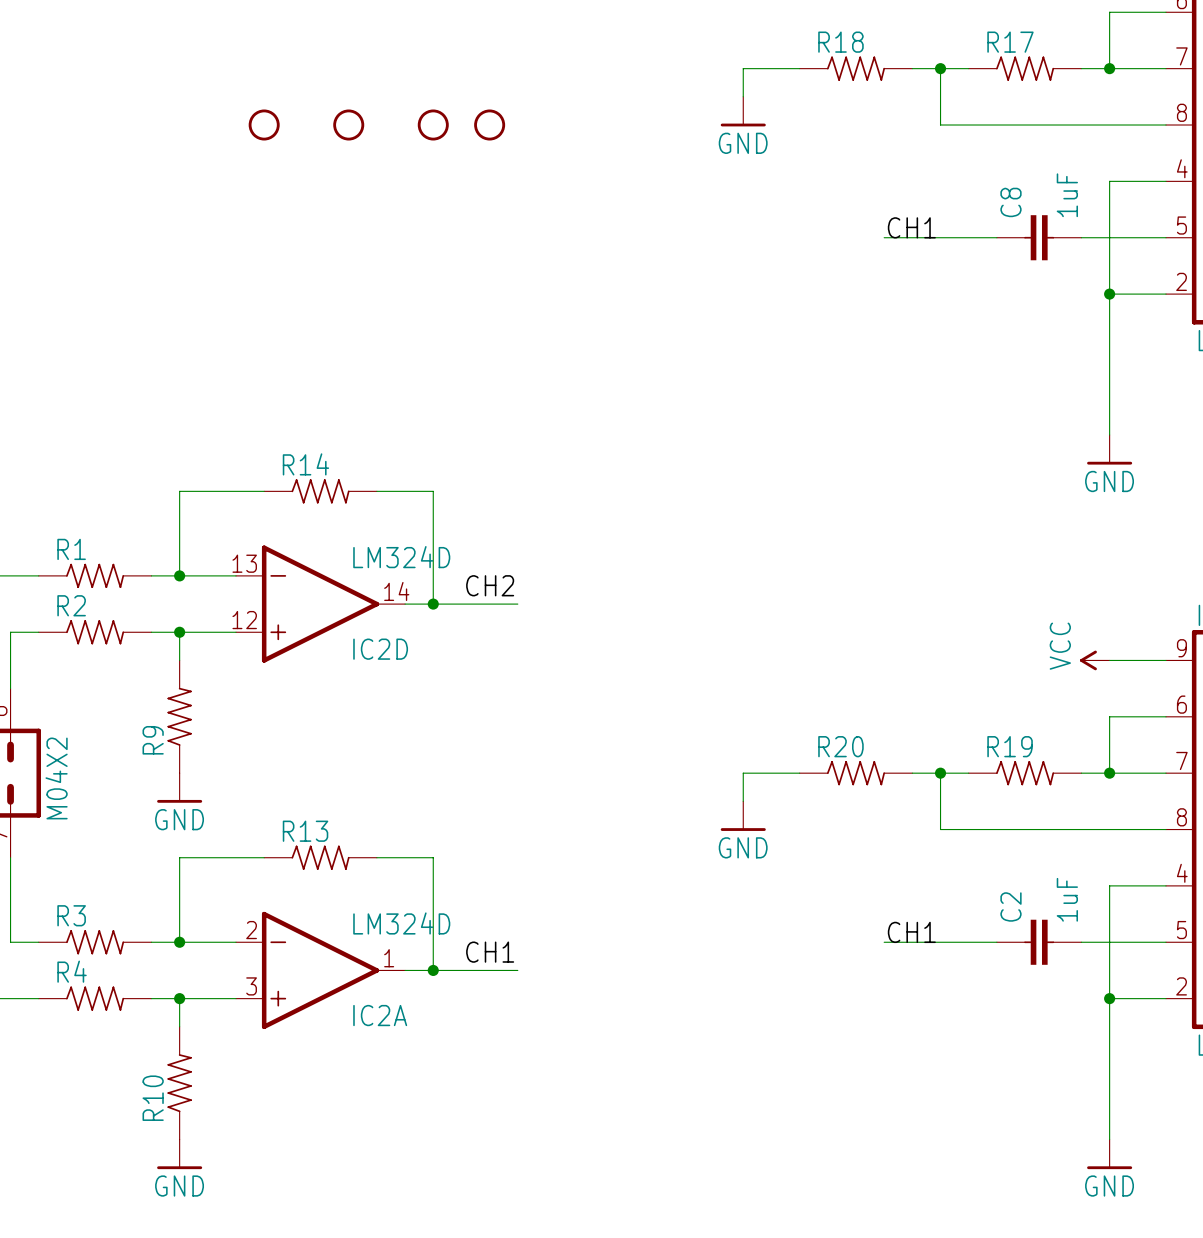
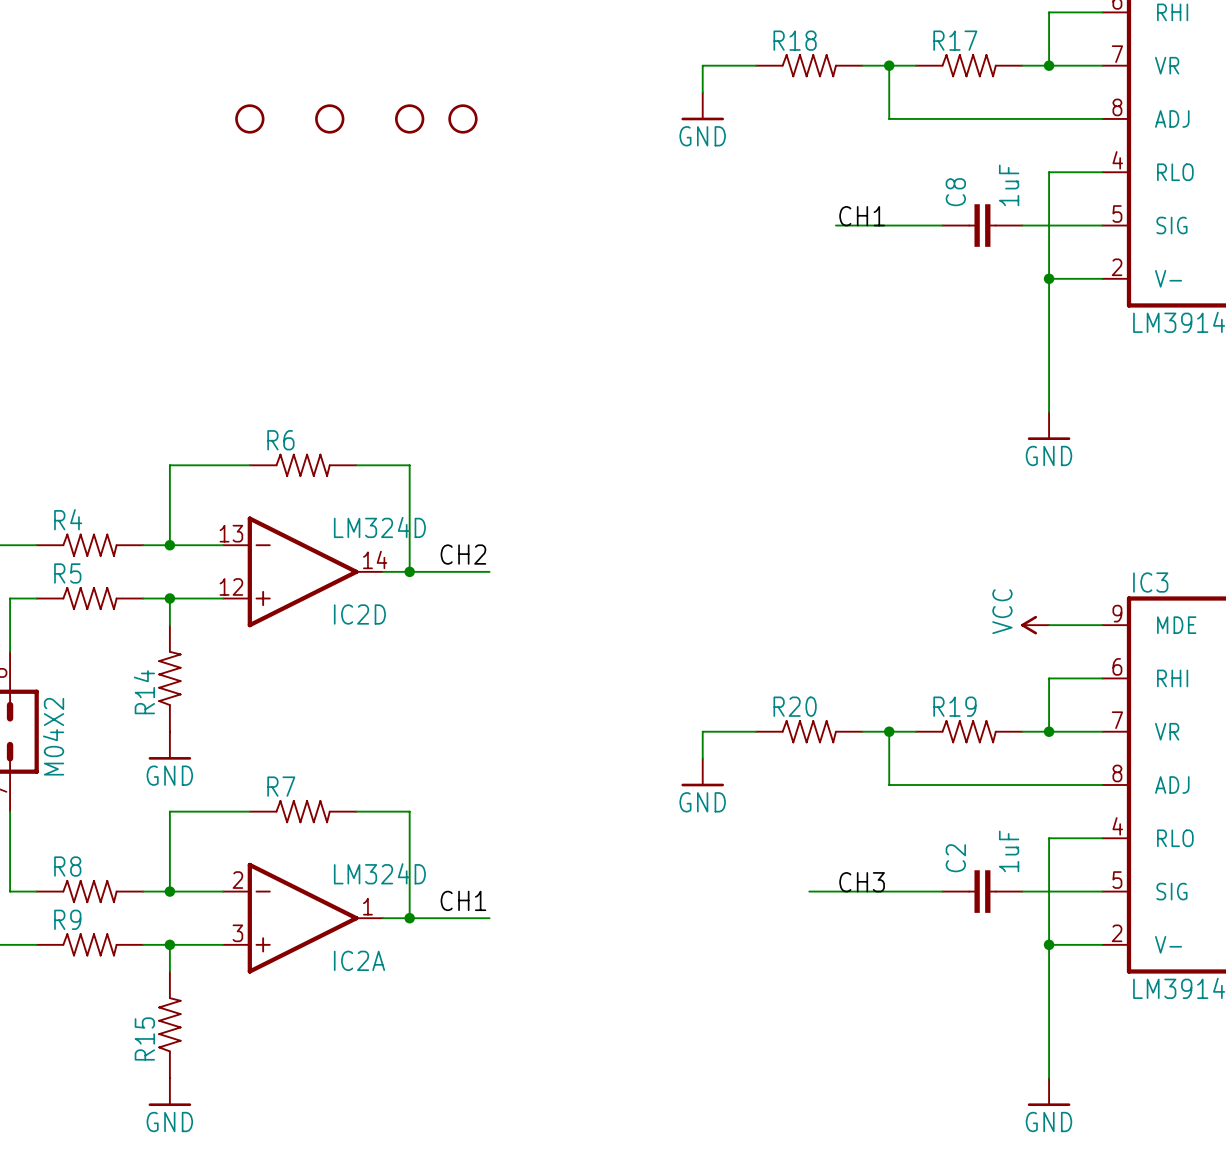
R14 name: R14 (305, 464) -> R6 (280, 440)
R1 name: R1 (71, 549) -> R4 (68, 519)
R2 name: R2 (71, 605) -> R5 (67, 573)
R9 name: R9 (153, 740) -> R14 (144, 692)
R13 name: R13 (305, 831) -> R7 (281, 786)
R3 name: R3 (71, 915) -> R8 (67, 866)
label: CH1 (911, 932) -> CH3 (862, 882)
wire: none -> (809, 891) (835, 891)
R4 name: R4 (72, 971) -> R9 (67, 919)
R10 name: R10 (153, 1098) -> R15 (144, 1038)

